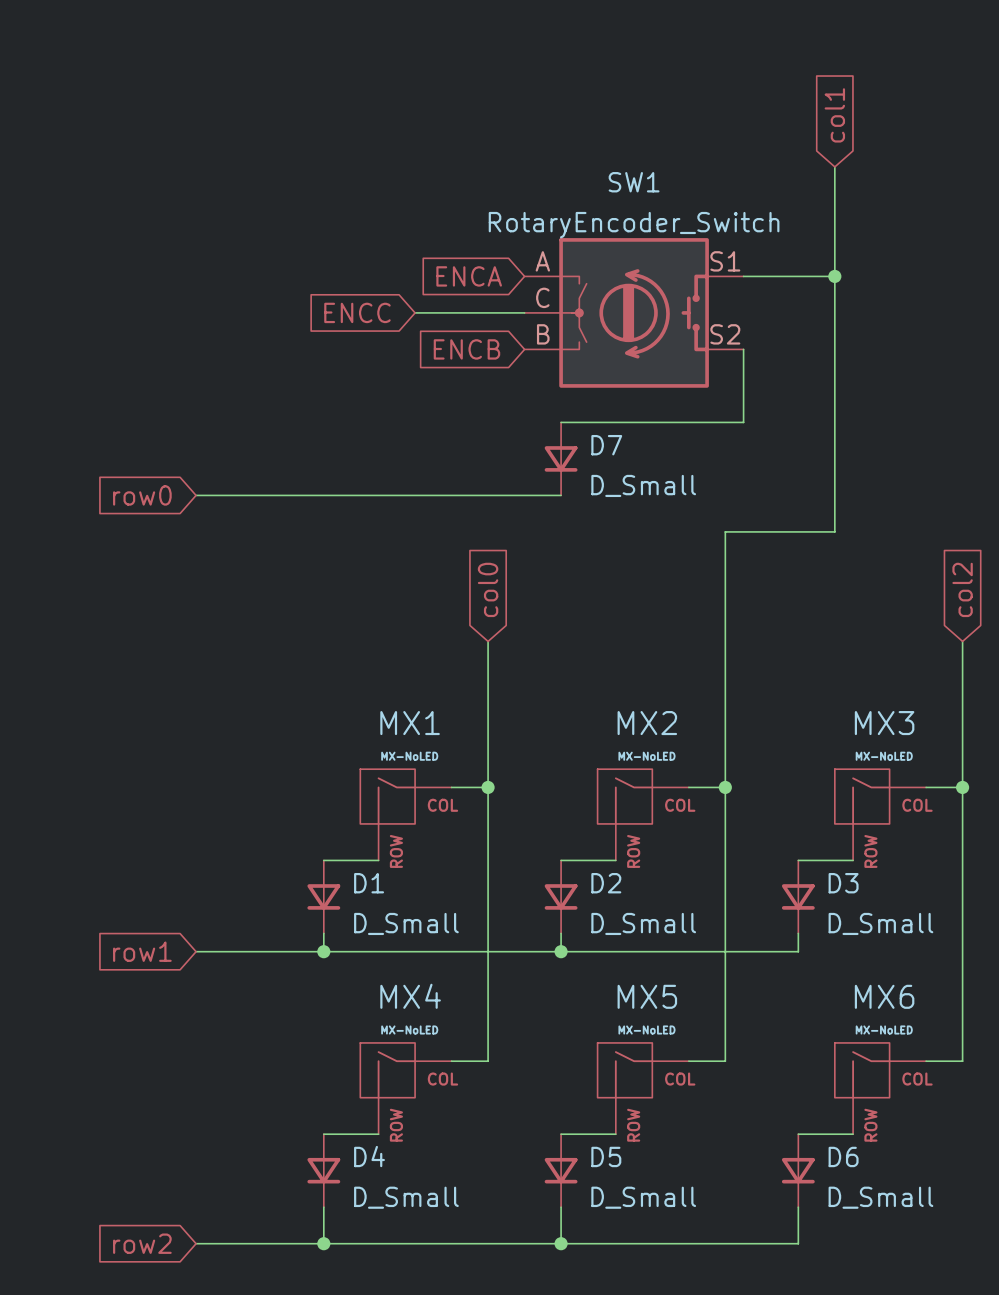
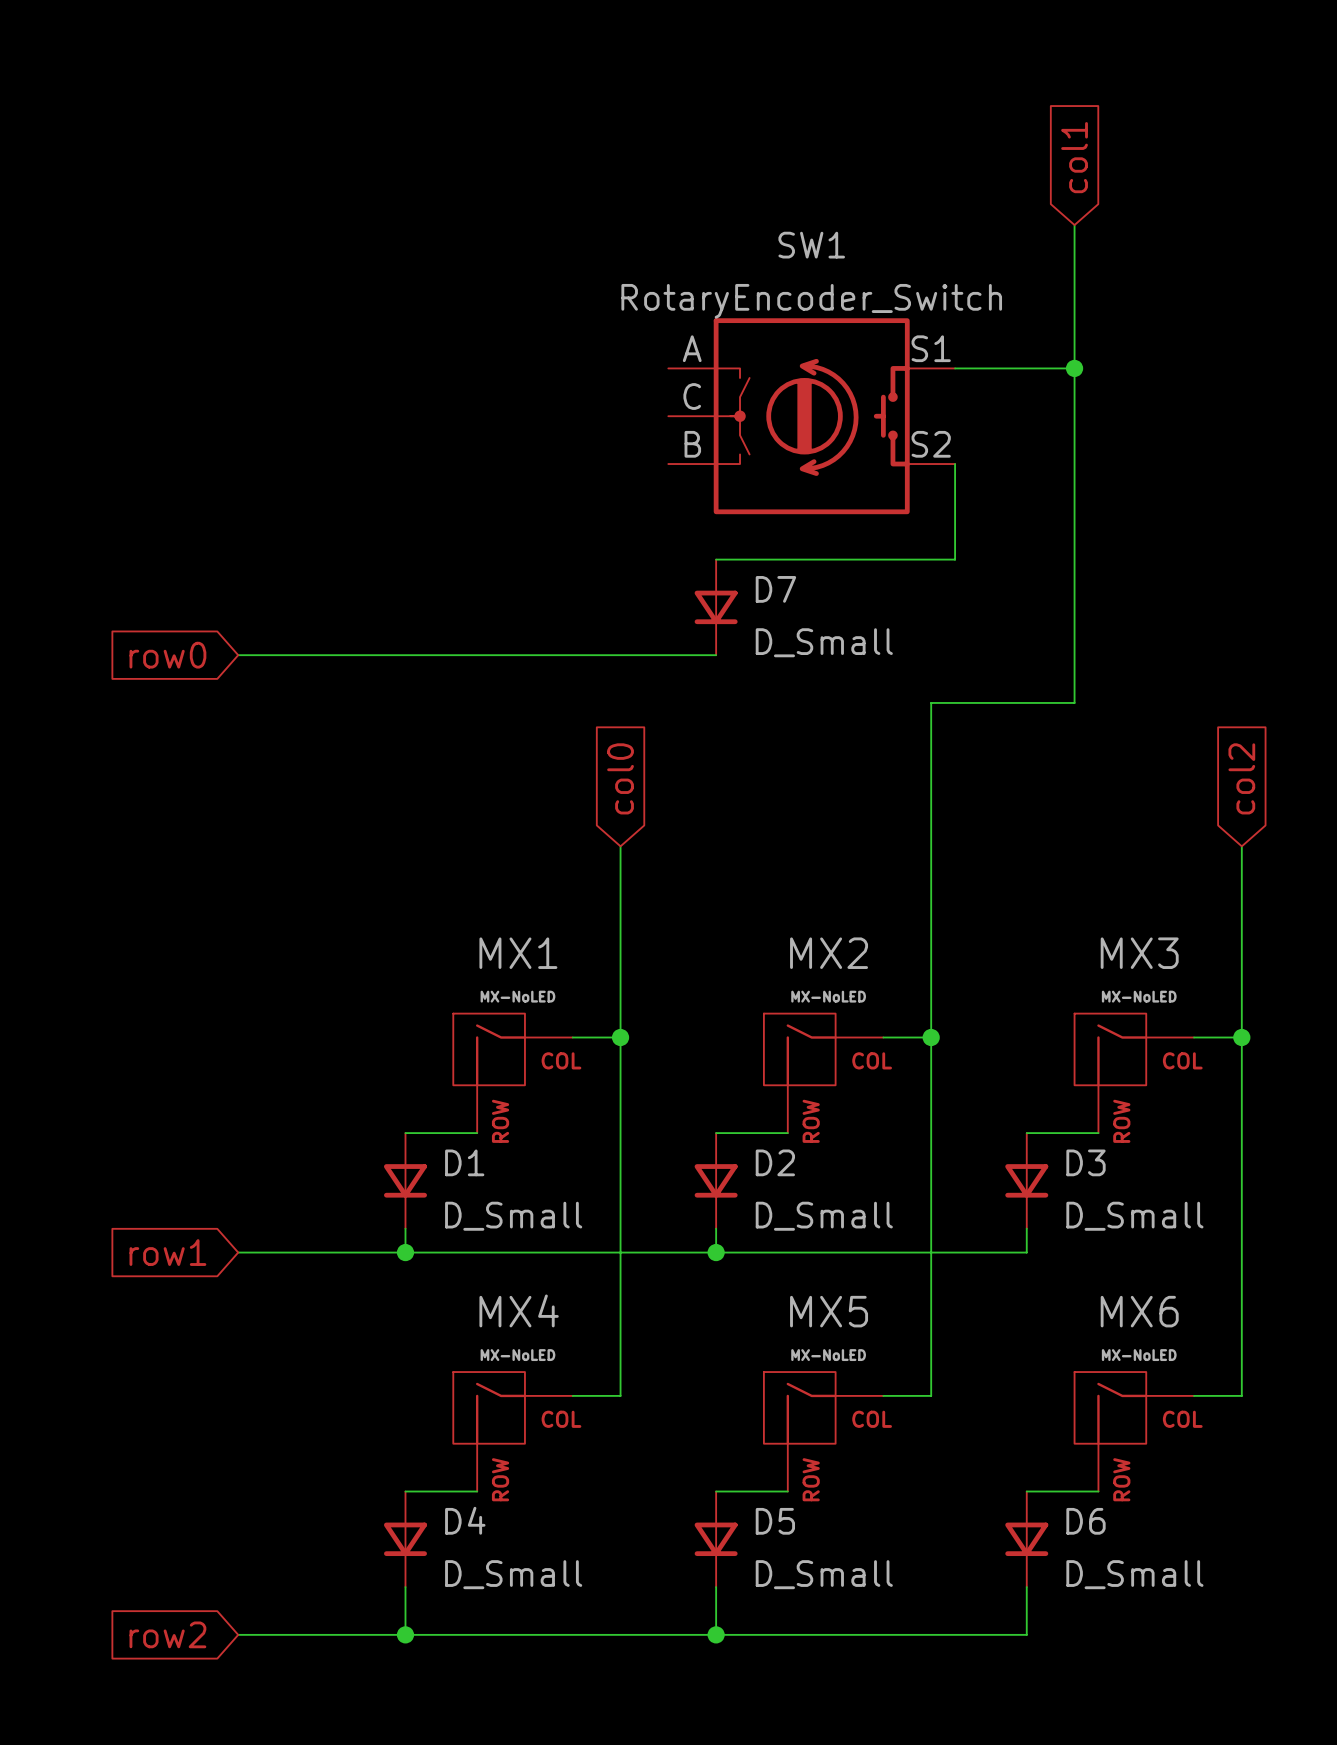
global label: ENCA (469, 276) -> none
global label: ENCC (357, 312) -> none
wire: (415, 312) (524, 312) -> none
global label: ENCB (466, 349) -> none

